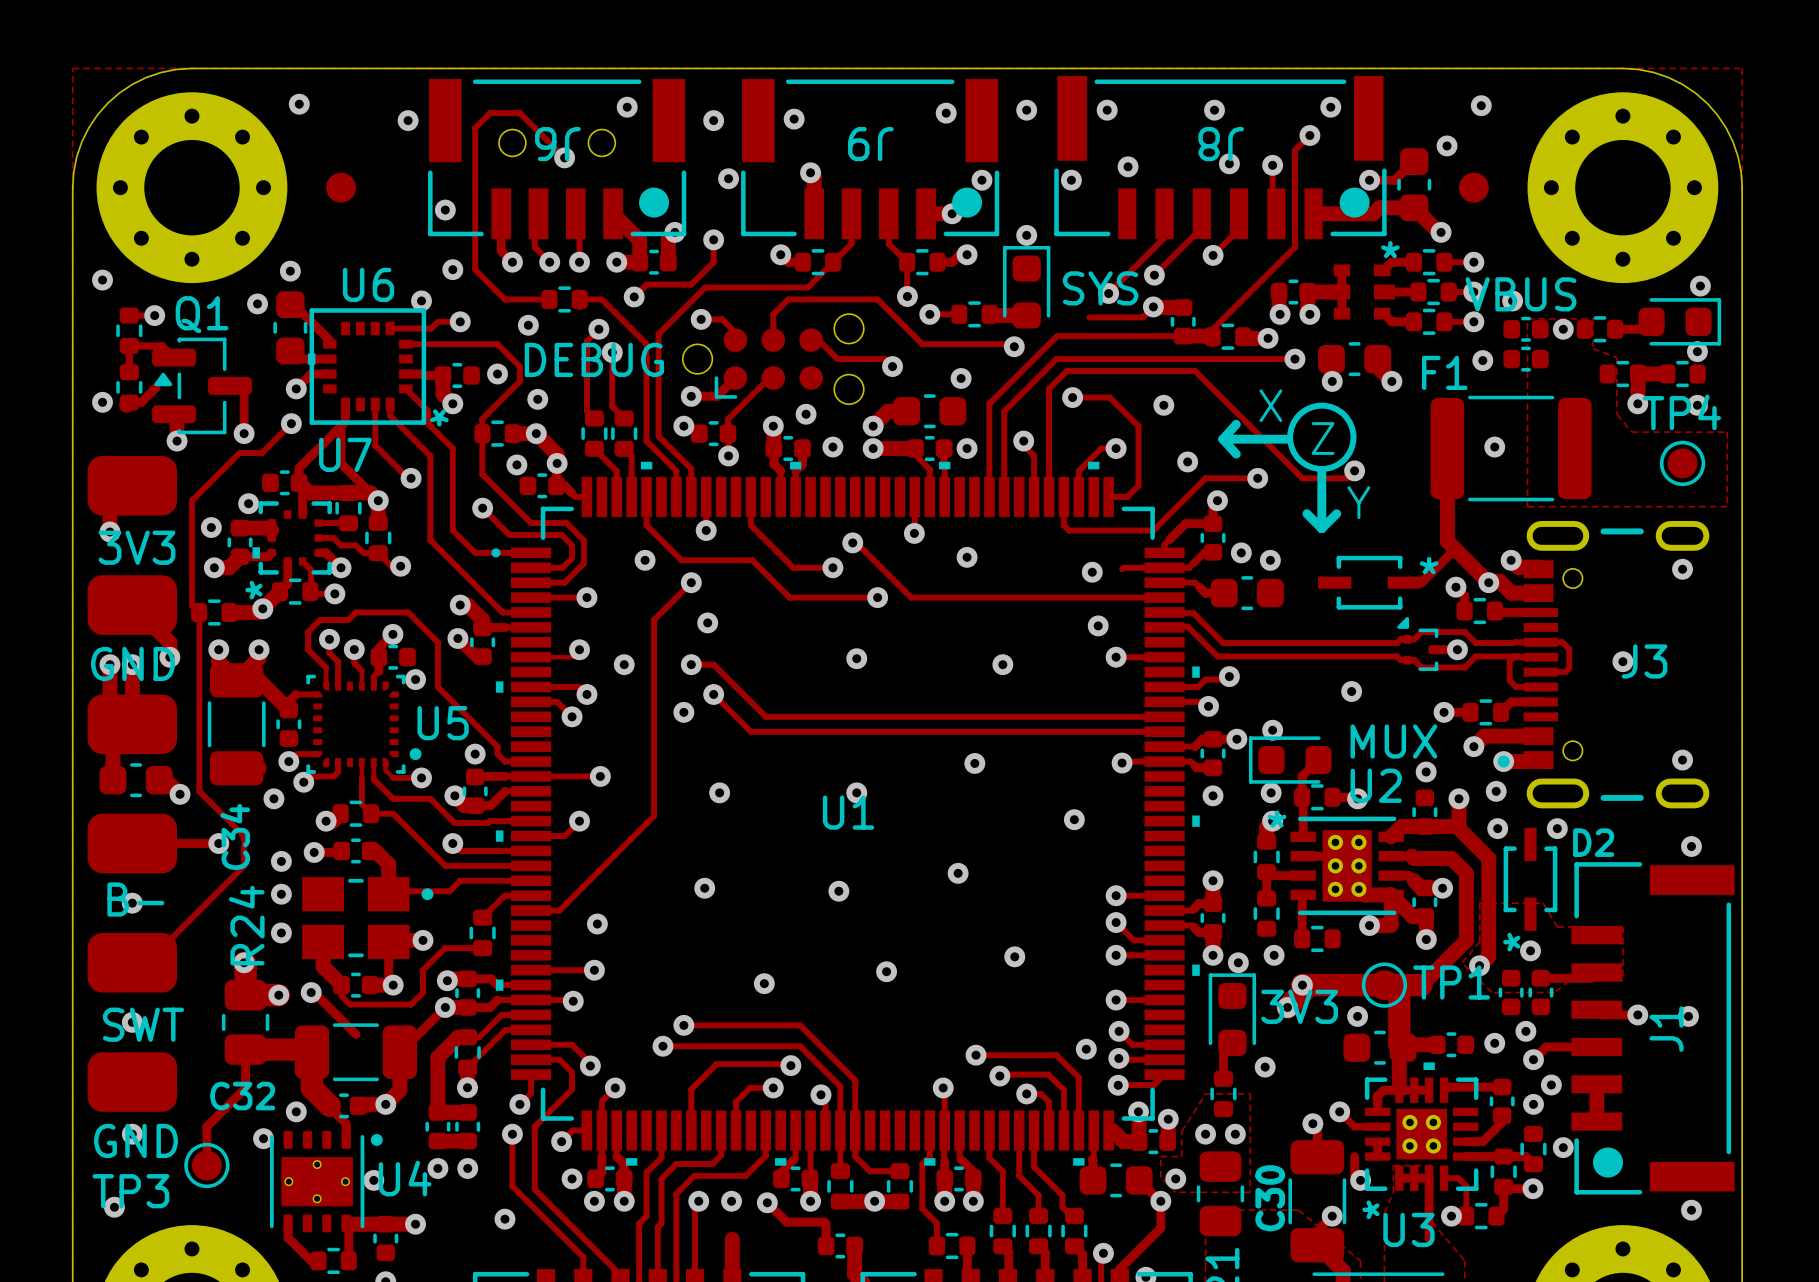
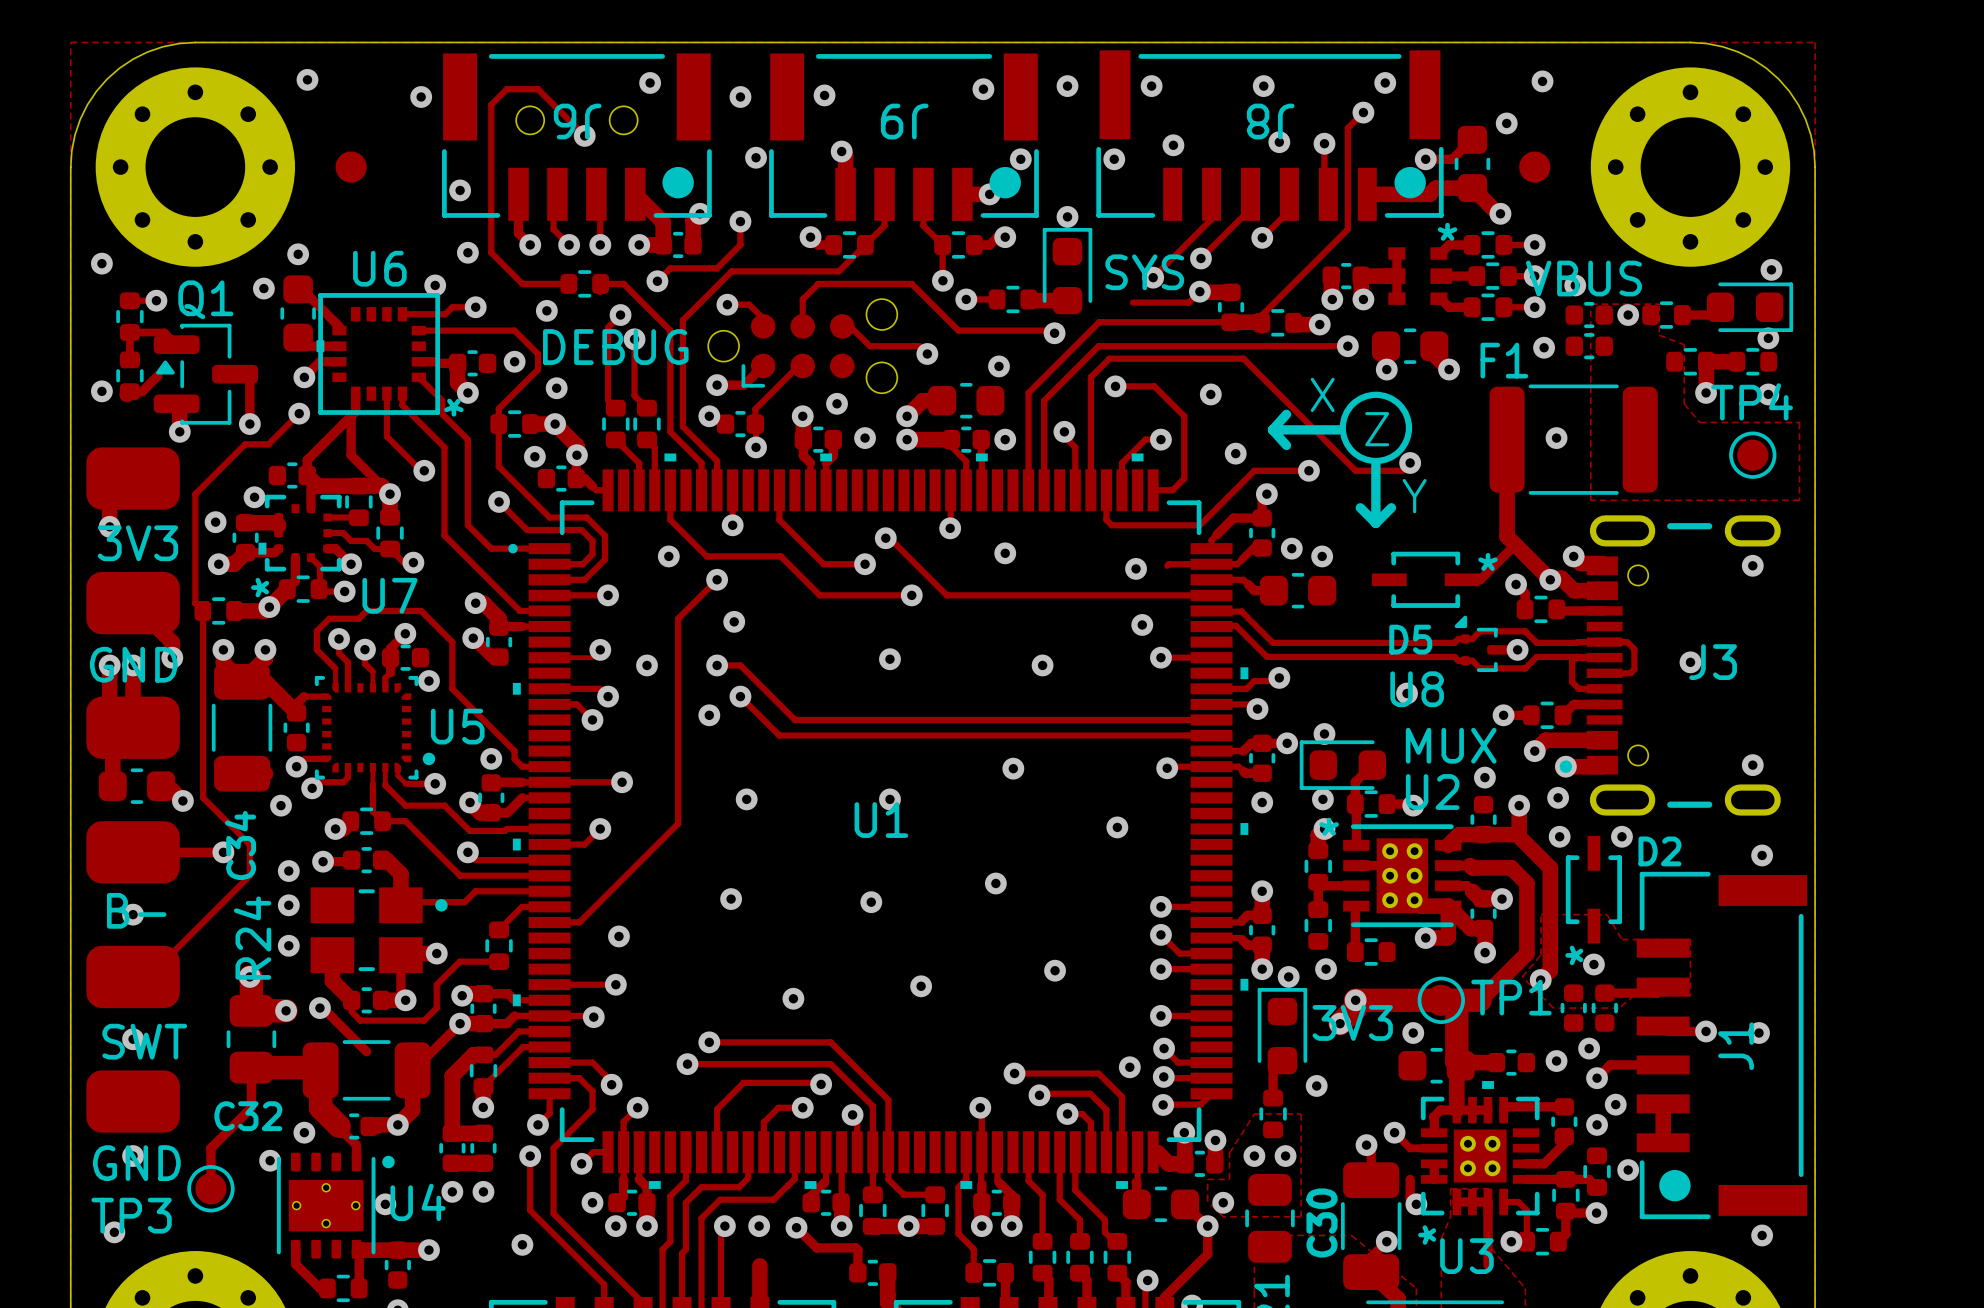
U7 name position: U7 (345, 454) -> U7 (389, 595)
text: none -> D5 (1410, 639)
text: none -> U8 (1417, 689)

